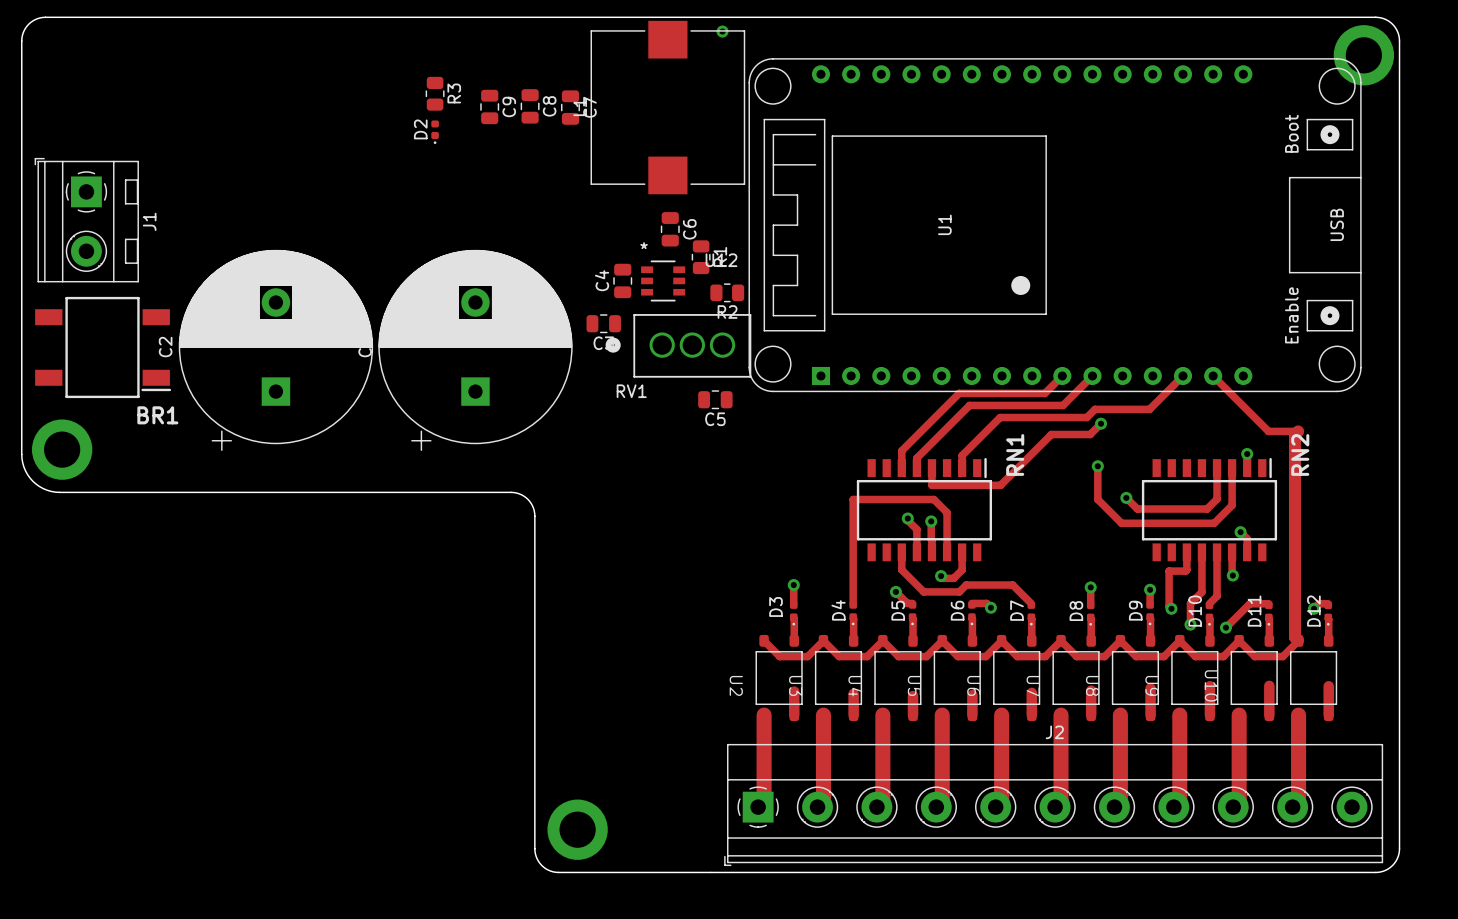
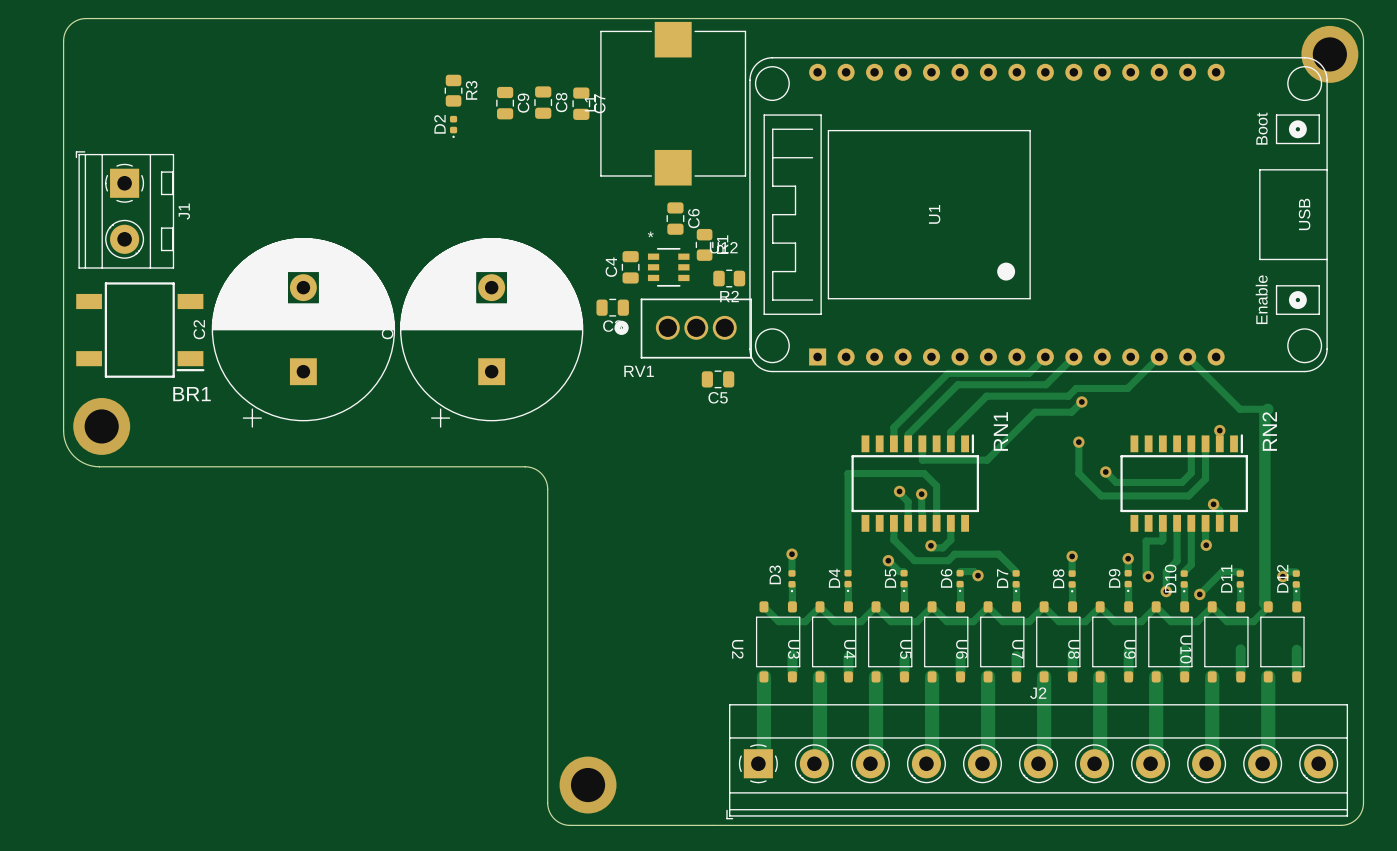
via: (722, 31) -> none

